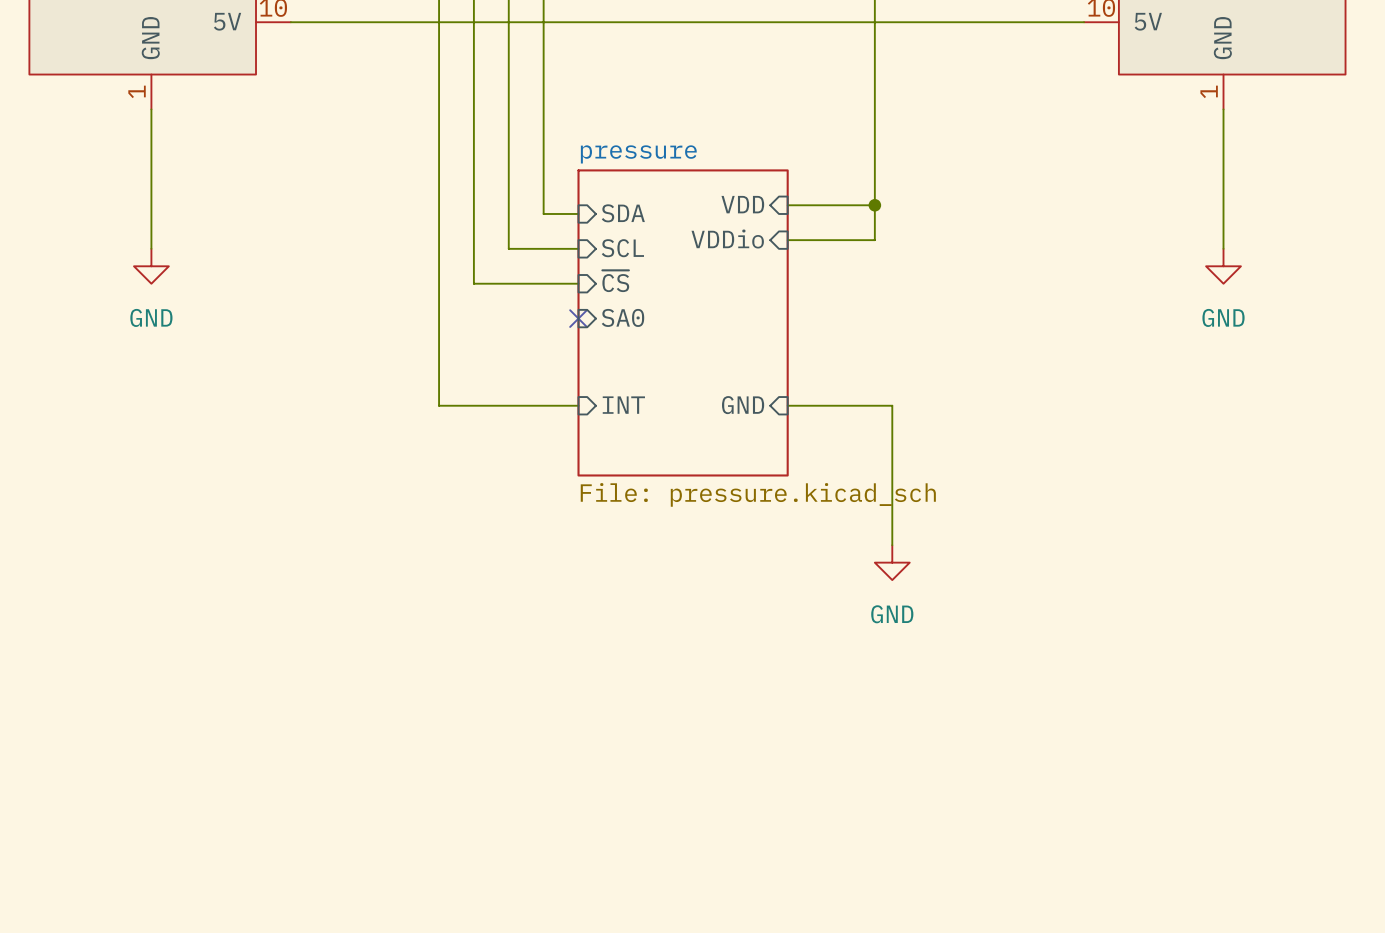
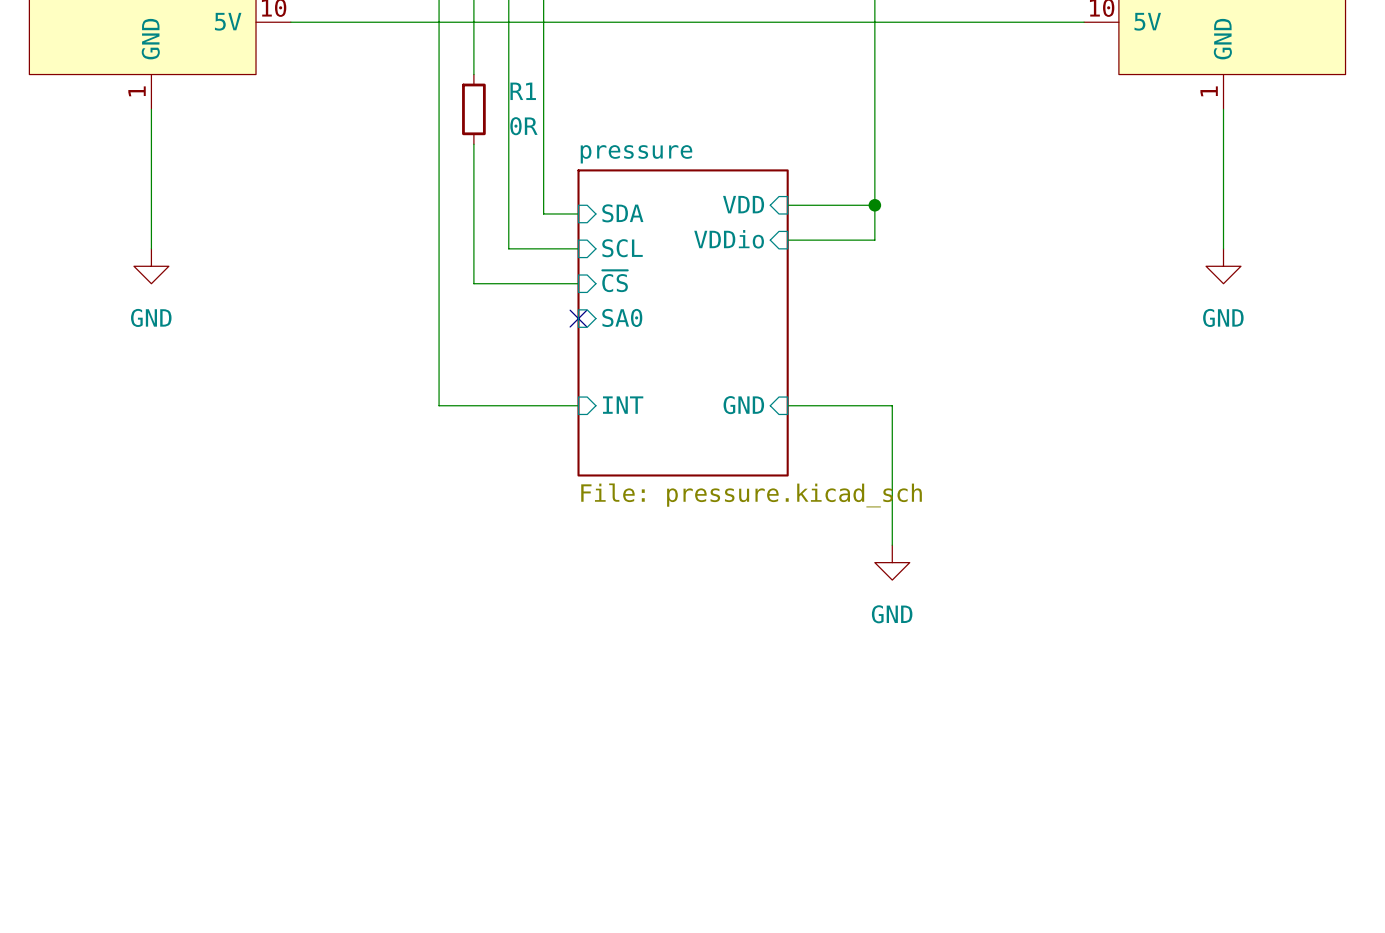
wire: (473, 74) (473, 144) -> none
R1: none -> 0R (473, 109)

